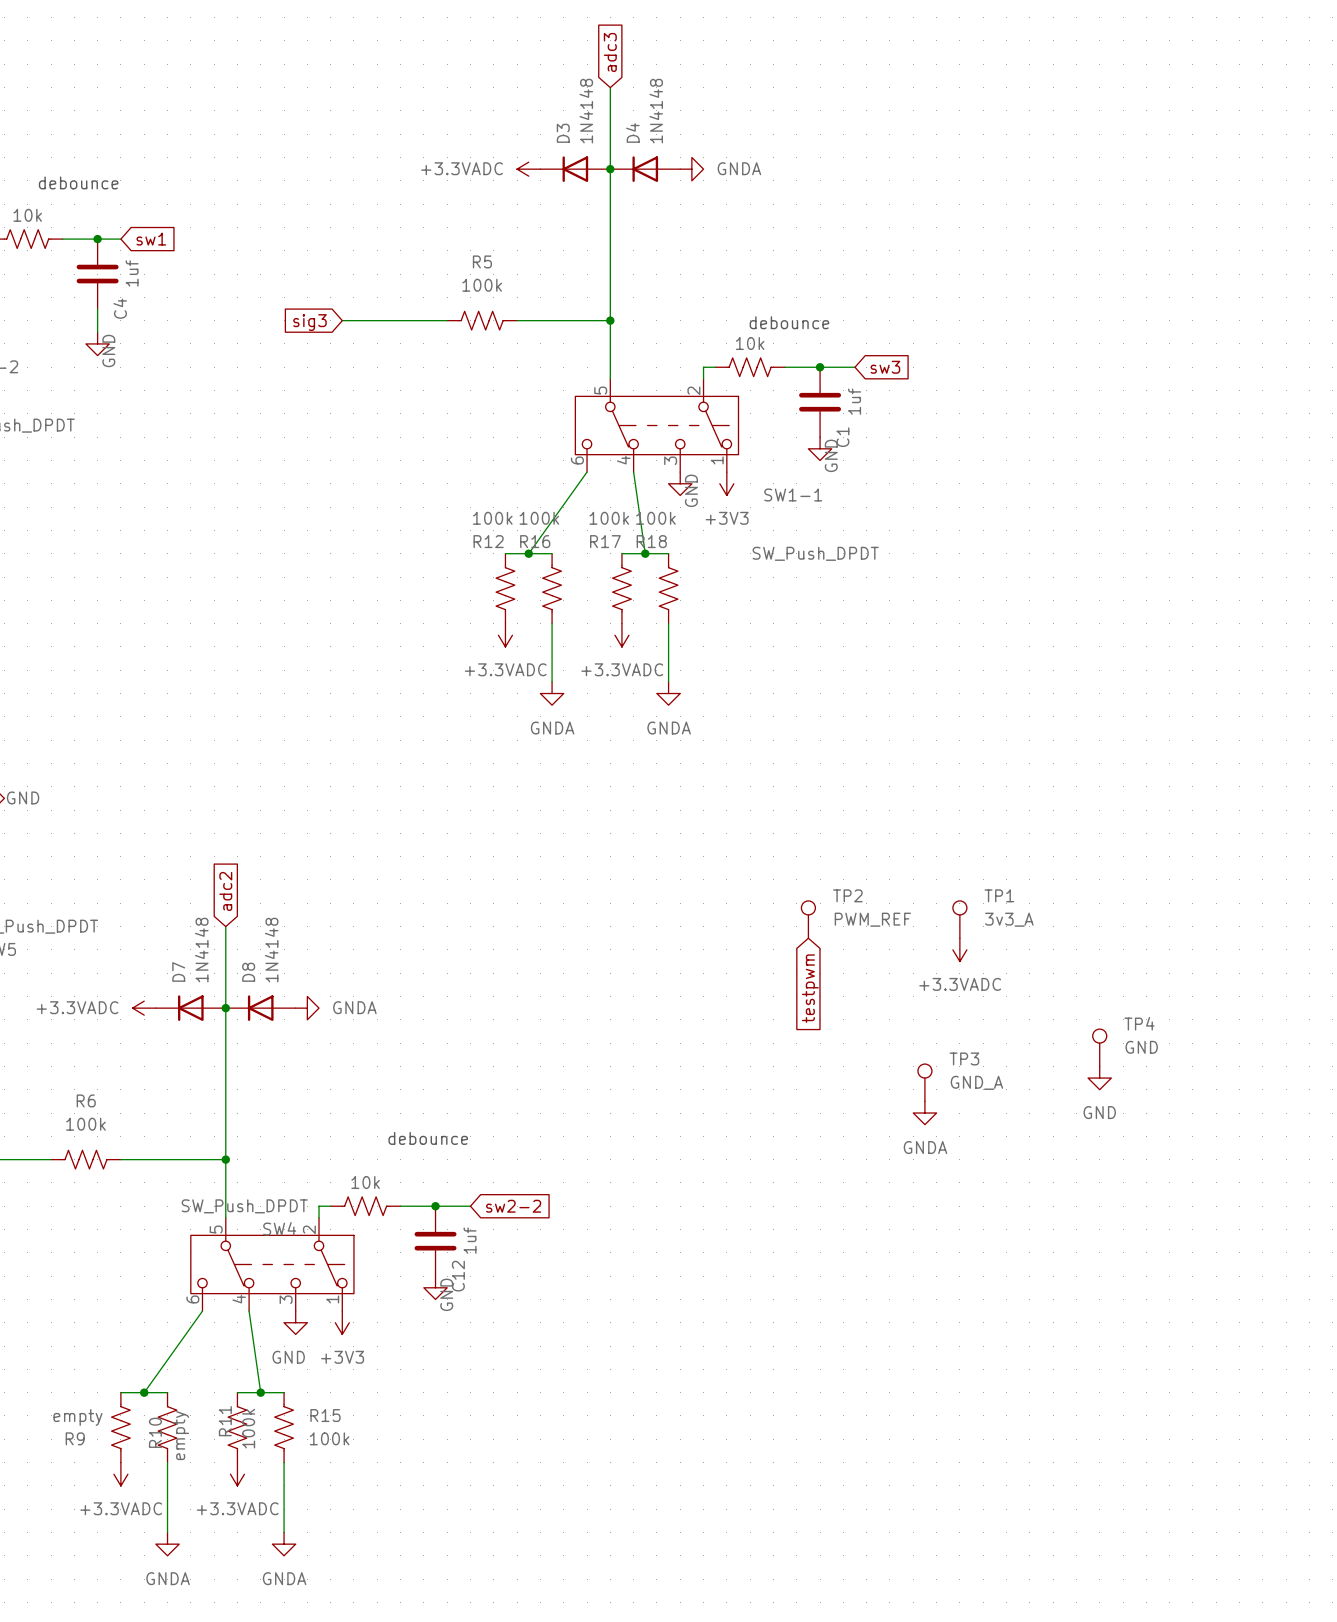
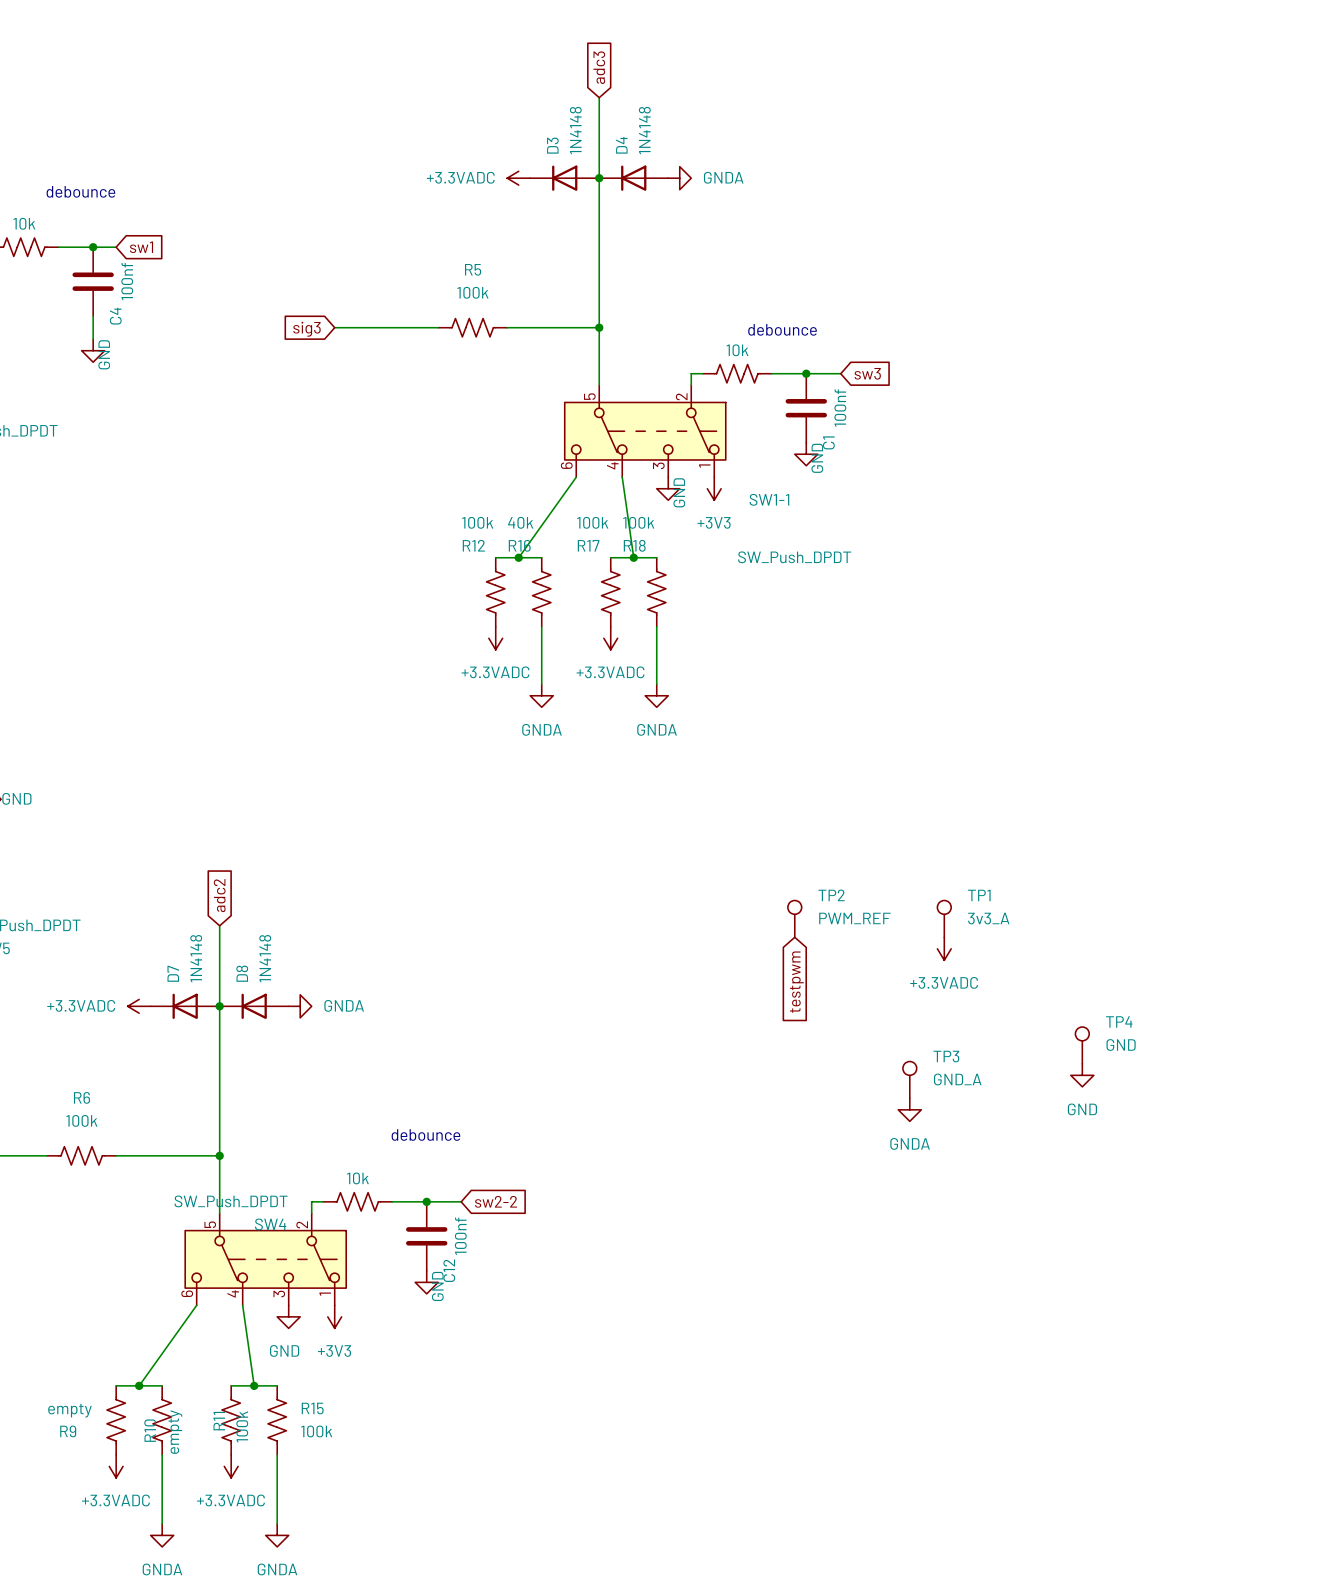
C4 value: 1uf (132, 273) -> 100nf (127, 281)
C1 value: 1uf (854, 401) -> 100nf (840, 408)
R16 value: 100k (539, 518) -> 40k (520, 522)
C12 value: 1uf (470, 1240) -> 100nf (460, 1236)

